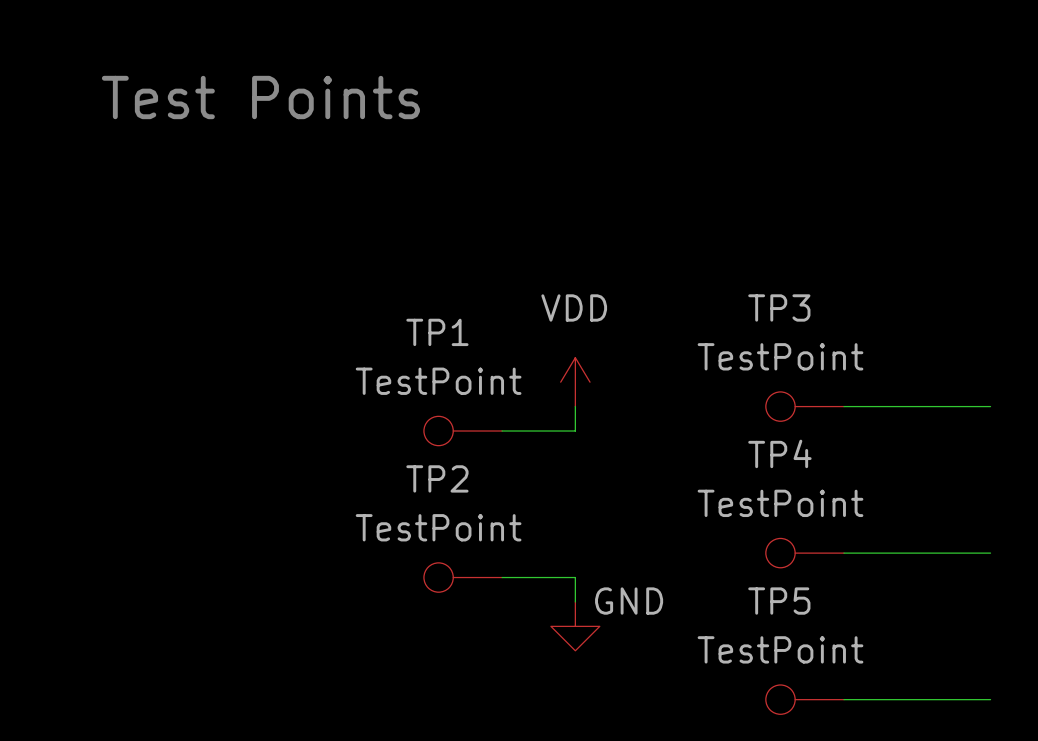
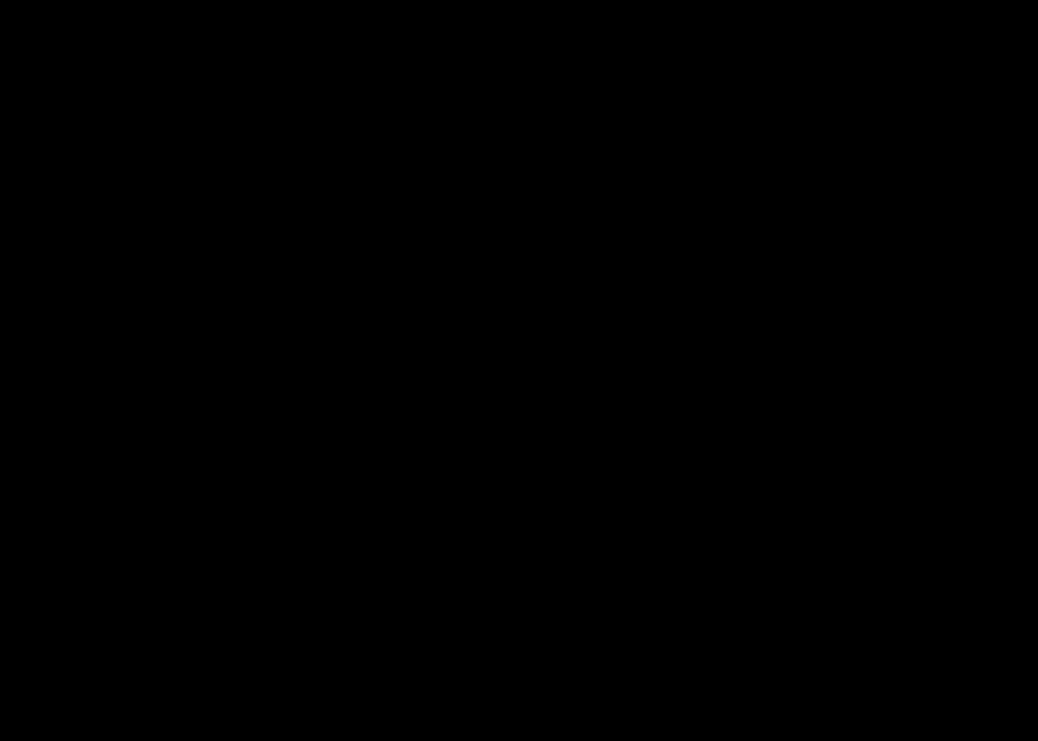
text: Test Points (260, 97) -> none
power symbol: VDD (575, 382) -> none
wire: (575, 406) (575, 431) (502, 431) -> none
TP3: TestPoint (804, 406) -> none
wire: (844, 406) (990, 406) -> none
TP1: TestPoint (463, 431) -> none
TP4: TestPoint (804, 553) -> none
wire: (844, 553) (990, 553) -> none
TP2: TestPoint (463, 577) -> none
wire: (502, 577) (575, 577) (575, 601) -> none
power symbol: GND (575, 626) -> none
TP5: TestPoint (804, 699) -> none
wire: (844, 699) (990, 699) -> none

